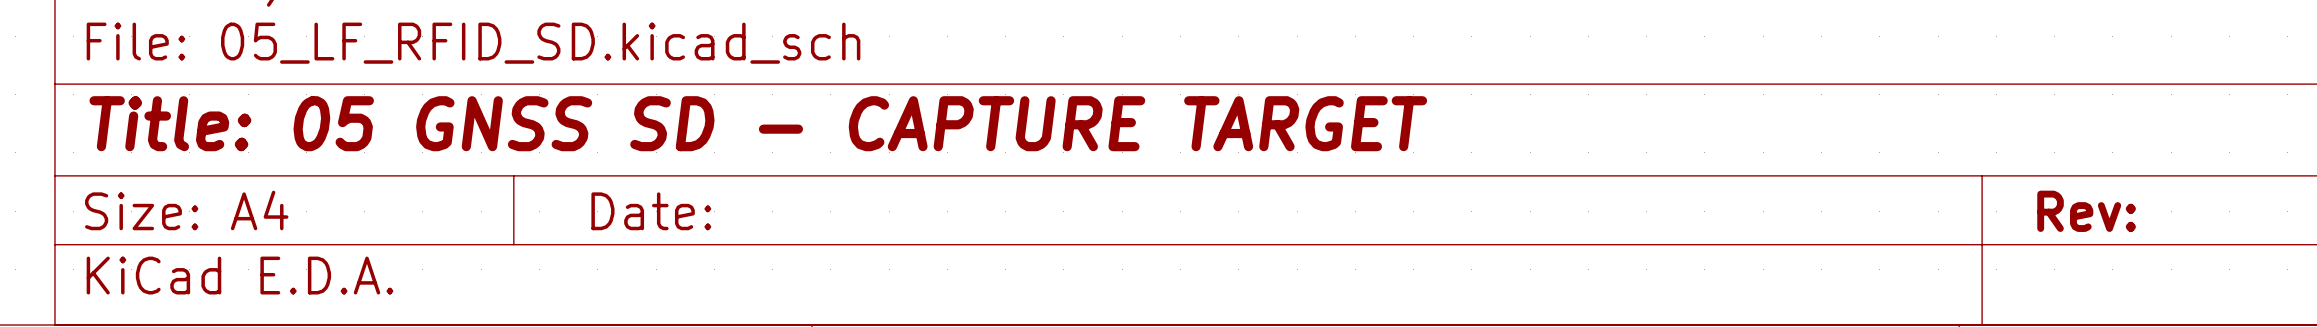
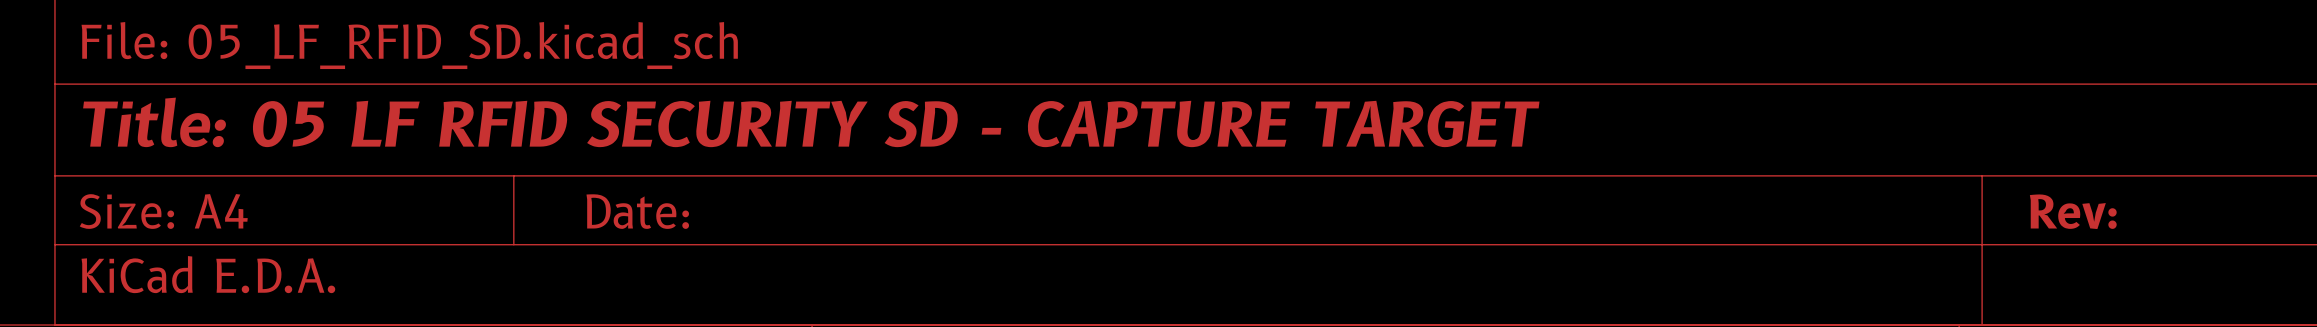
title block: Title: 05 GNSS SD - CAPTURE TARGET (758, 123) -> Title: 05 LF RFID SECURITY SD - CAPTURE TARGET (811, 122)

